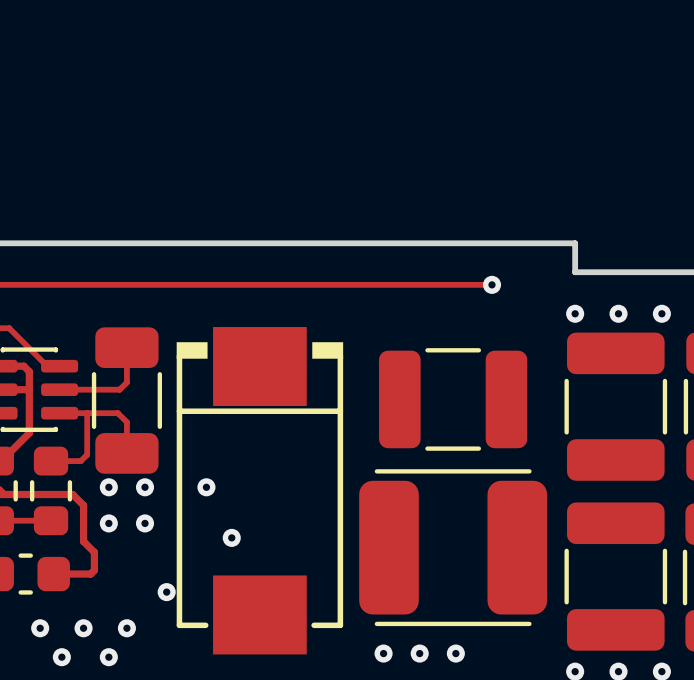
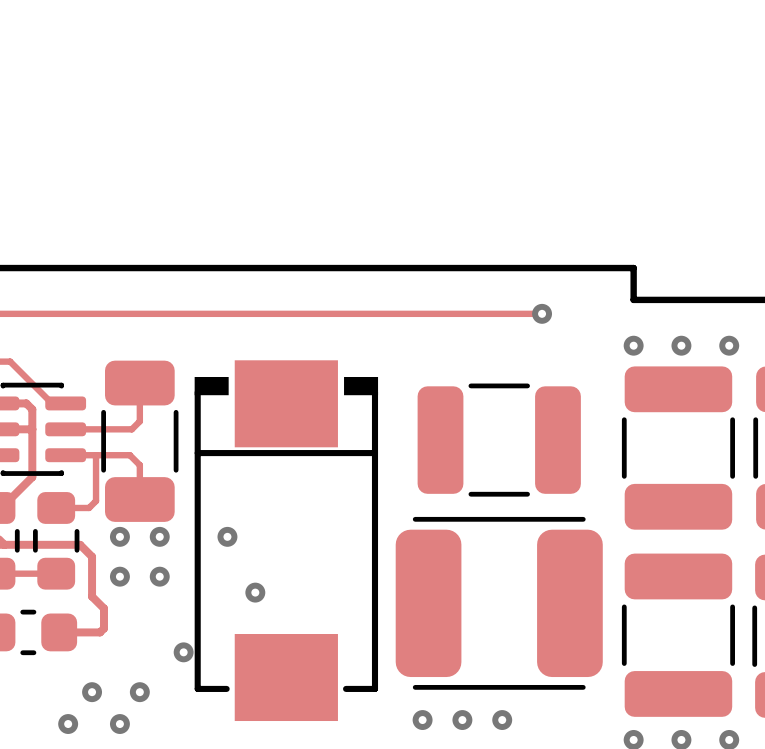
via: (40, 628) -> none

